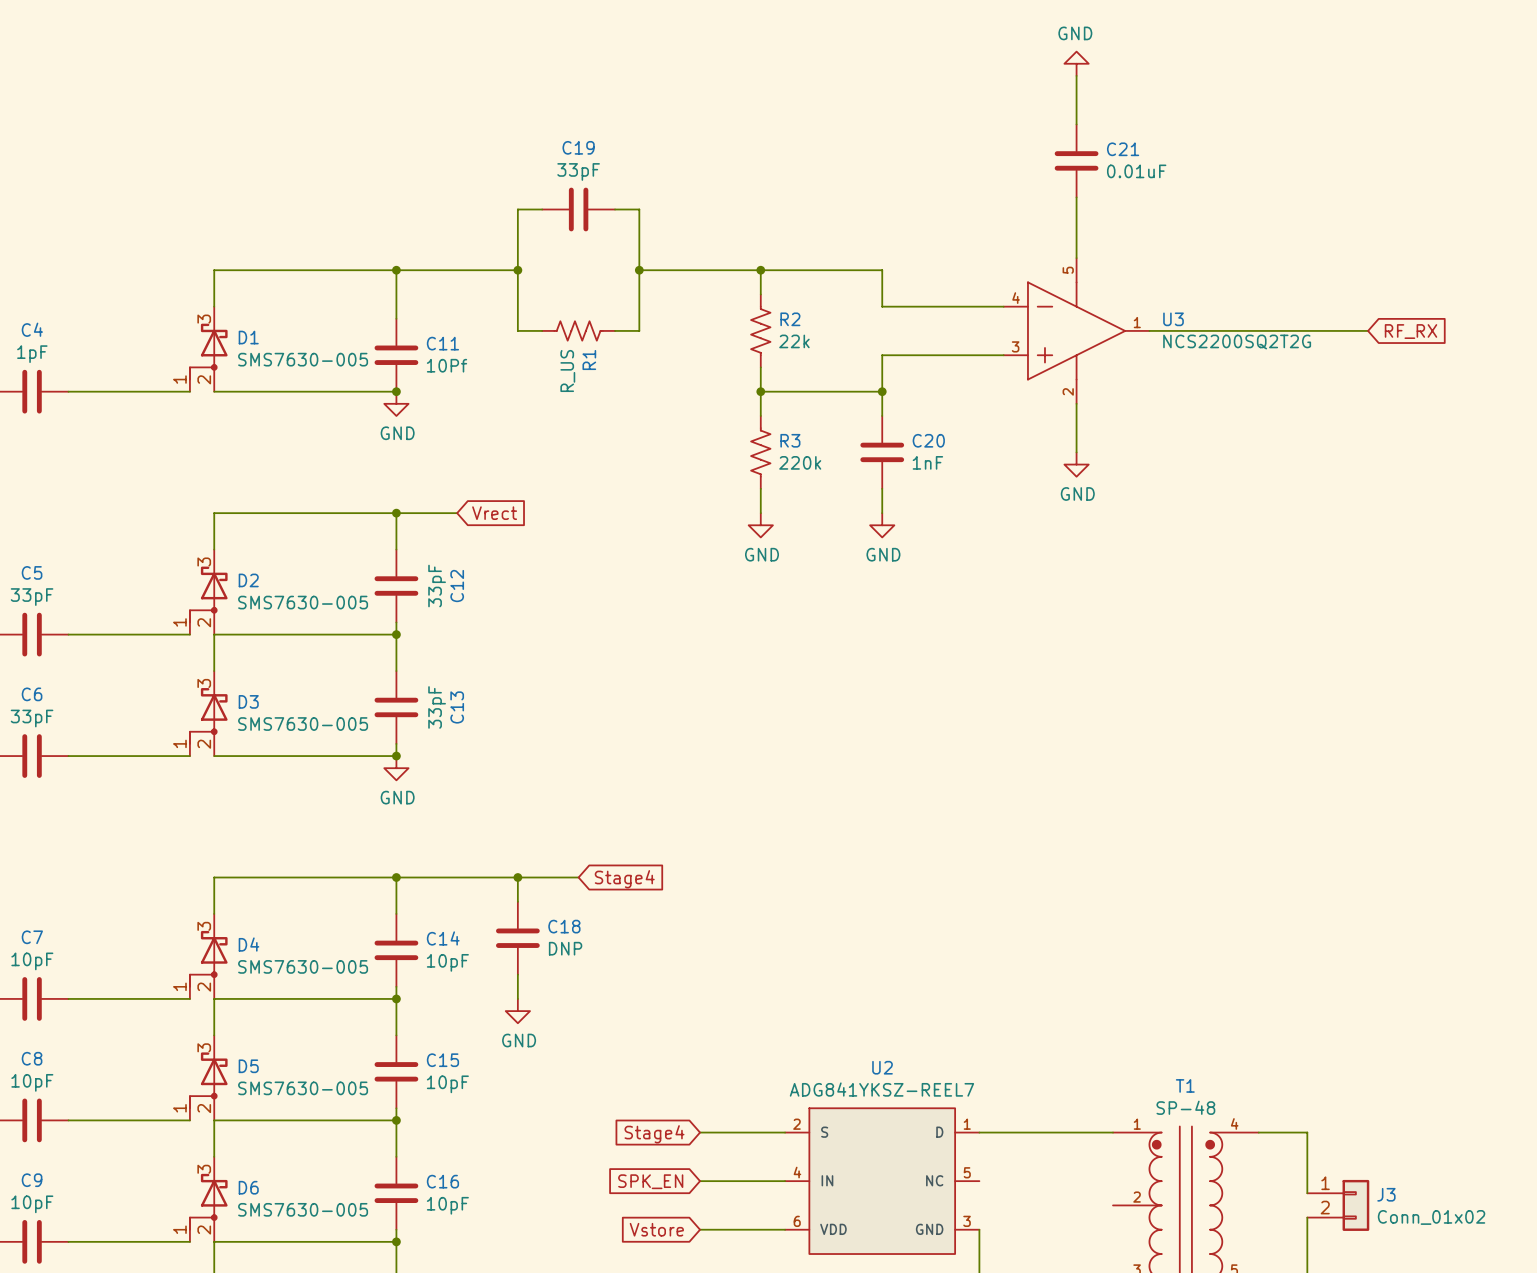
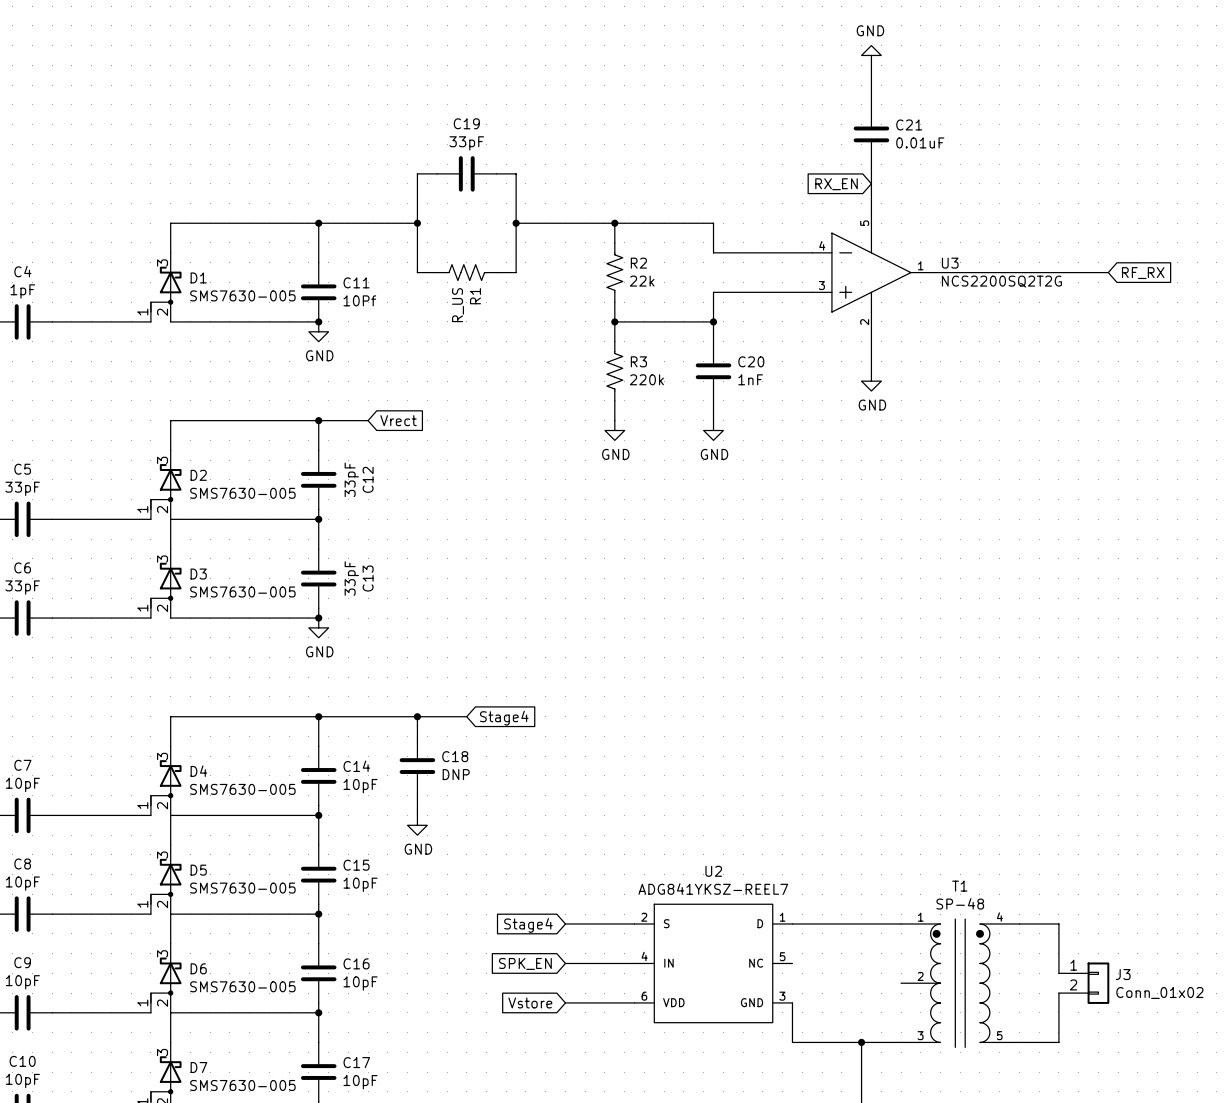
global label: none -> RX_EN (836, 184)

